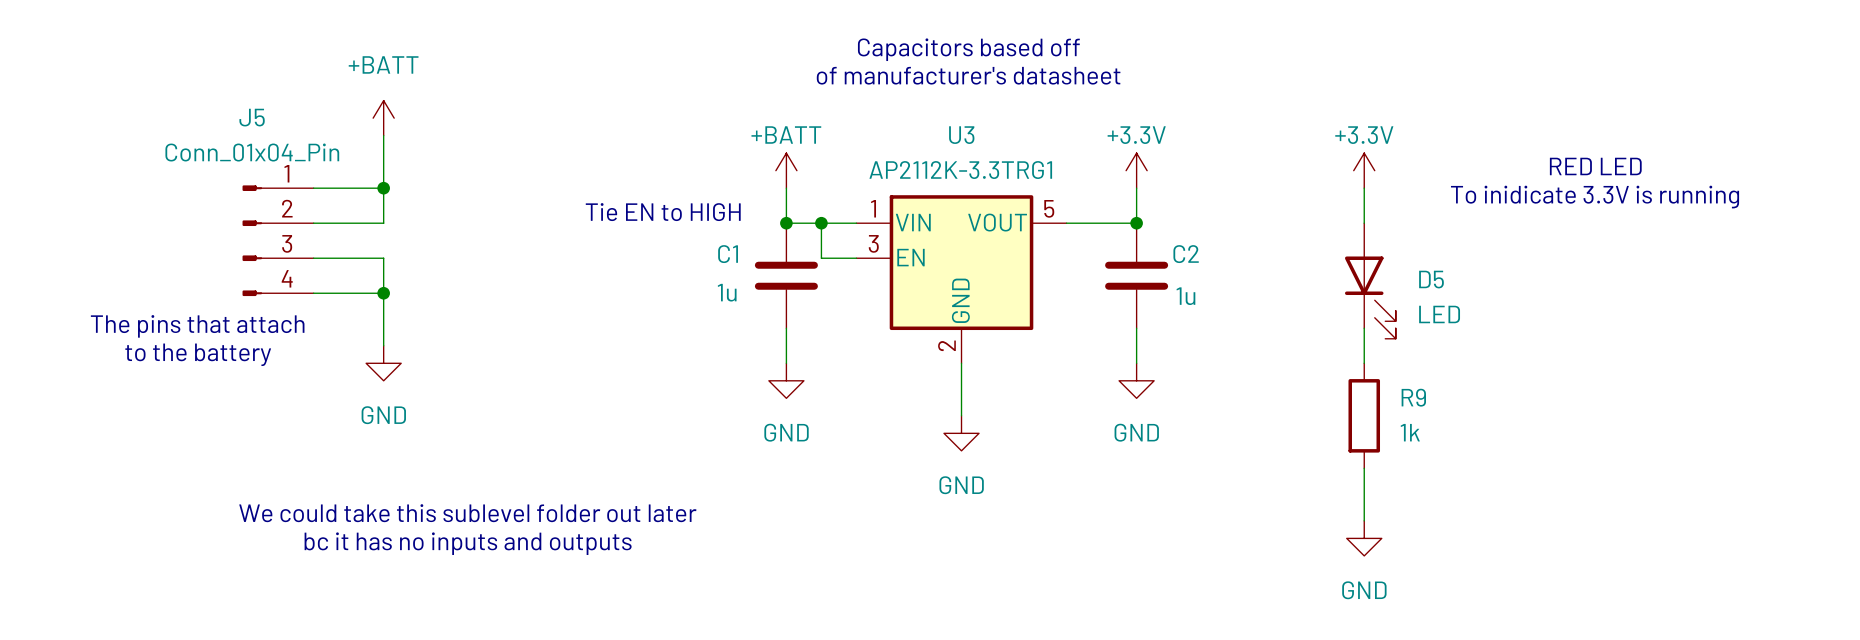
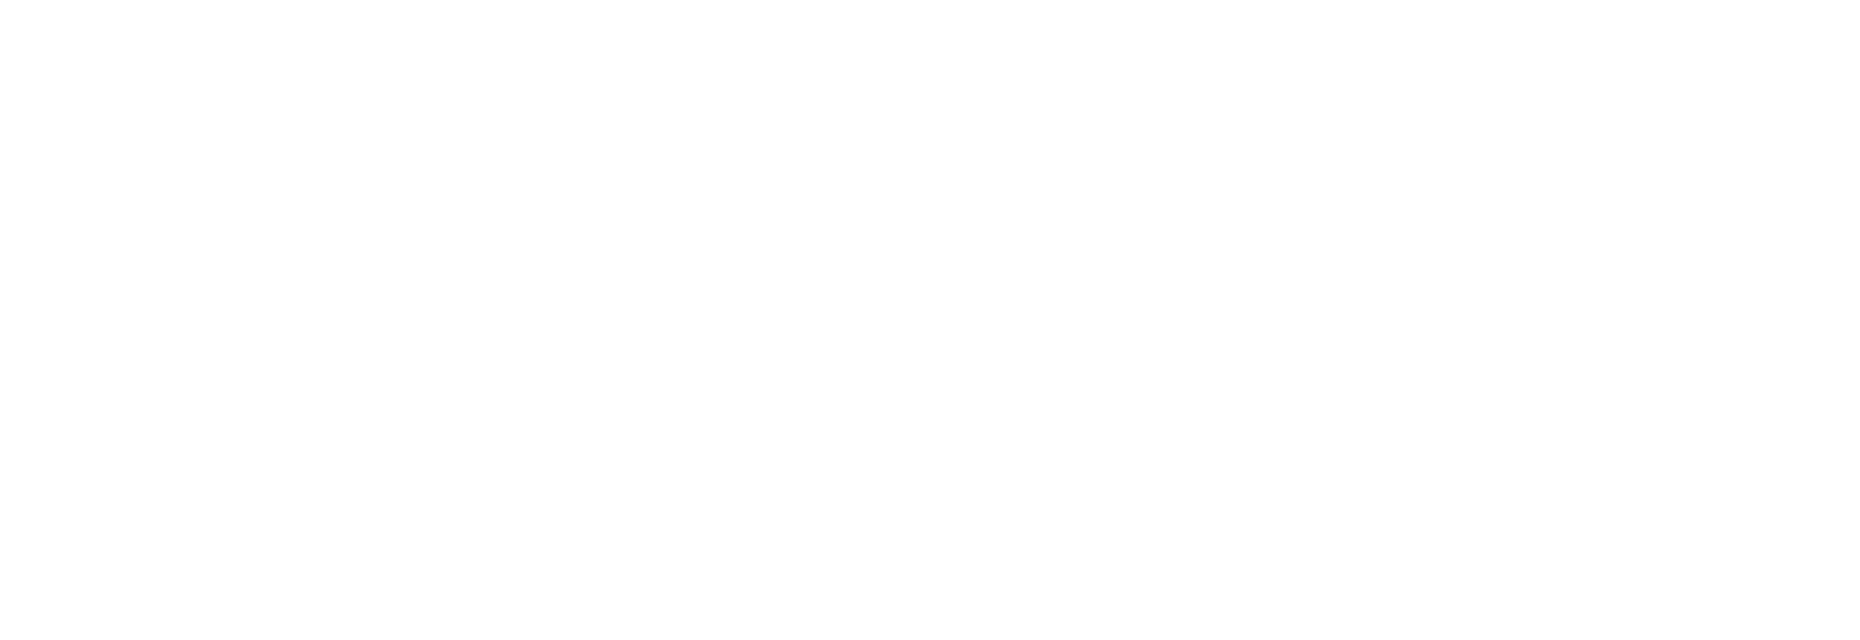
text: Capacitors based off (968, 49) -> none
text: of manufacturer's datasheet (968, 75) -> none
power symbol: +BATT (383, 118) -> none
wire: (383, 135) (383, 223) (313, 223) -> none
text: RED LED (1595, 166) -> none
power symbol: +BATT (786, 170) -> none
power symbol: +3.3V (1136, 170) -> none
power symbol: +3.3V (1364, 170) -> none
wire: (313, 188) (383, 188) -> none
junction: (383, 188) -> none
wire: (786, 188) (786, 223) (856, 223) -> none
wire: (1136, 188) (1136, 223) (1066, 223) -> none
wire: (1364, 188) (1364, 223) -> none
text: To inidicate 3.3V is running (1595, 197) -> none
text: Tie EN to HIGH (663, 212) -> none
junction: (786, 223) -> none
wire: (821, 223) (821, 258) (856, 258) -> none
junction: (821, 223) -> none
junction: (1136, 223) -> none
J5: Conn_01x04_Pin (278, 240) -> none
wire: (313, 258) (383, 258) (383, 345) -> none
C1: 1u (786, 275) -> none
C2: 1u (1136, 275) -> none
U3: AP2112K-3.3TRG1 (961, 279) -> none
D5: LED (1370, 280) -> none
wire: (313, 293) (383, 293) -> none
junction: (383, 293) -> none
text: The pins that attach (197, 326) -> none
wire: (786, 328) (786, 363) -> none
wire: (1136, 328) (1136, 363) -> none
wire: (1364, 328) (1364, 363) -> none
text: to the battery (198, 354) -> none
power symbol: GND (383, 363) -> none
wire: (961, 363) (961, 415) -> none
power symbol: GND (786, 380) -> none
power symbol: GND (1136, 380) -> none
R9: 1k (1364, 415) -> none
power symbol: GND (961, 433) -> none
wire: (1364, 468) (1364, 520) -> none
text: We could take this sublevel folder out later (467, 513) -> none
power symbol: GND (1364, 538) -> none
text: bc it has no inputs and outputs (468, 543) -> none

